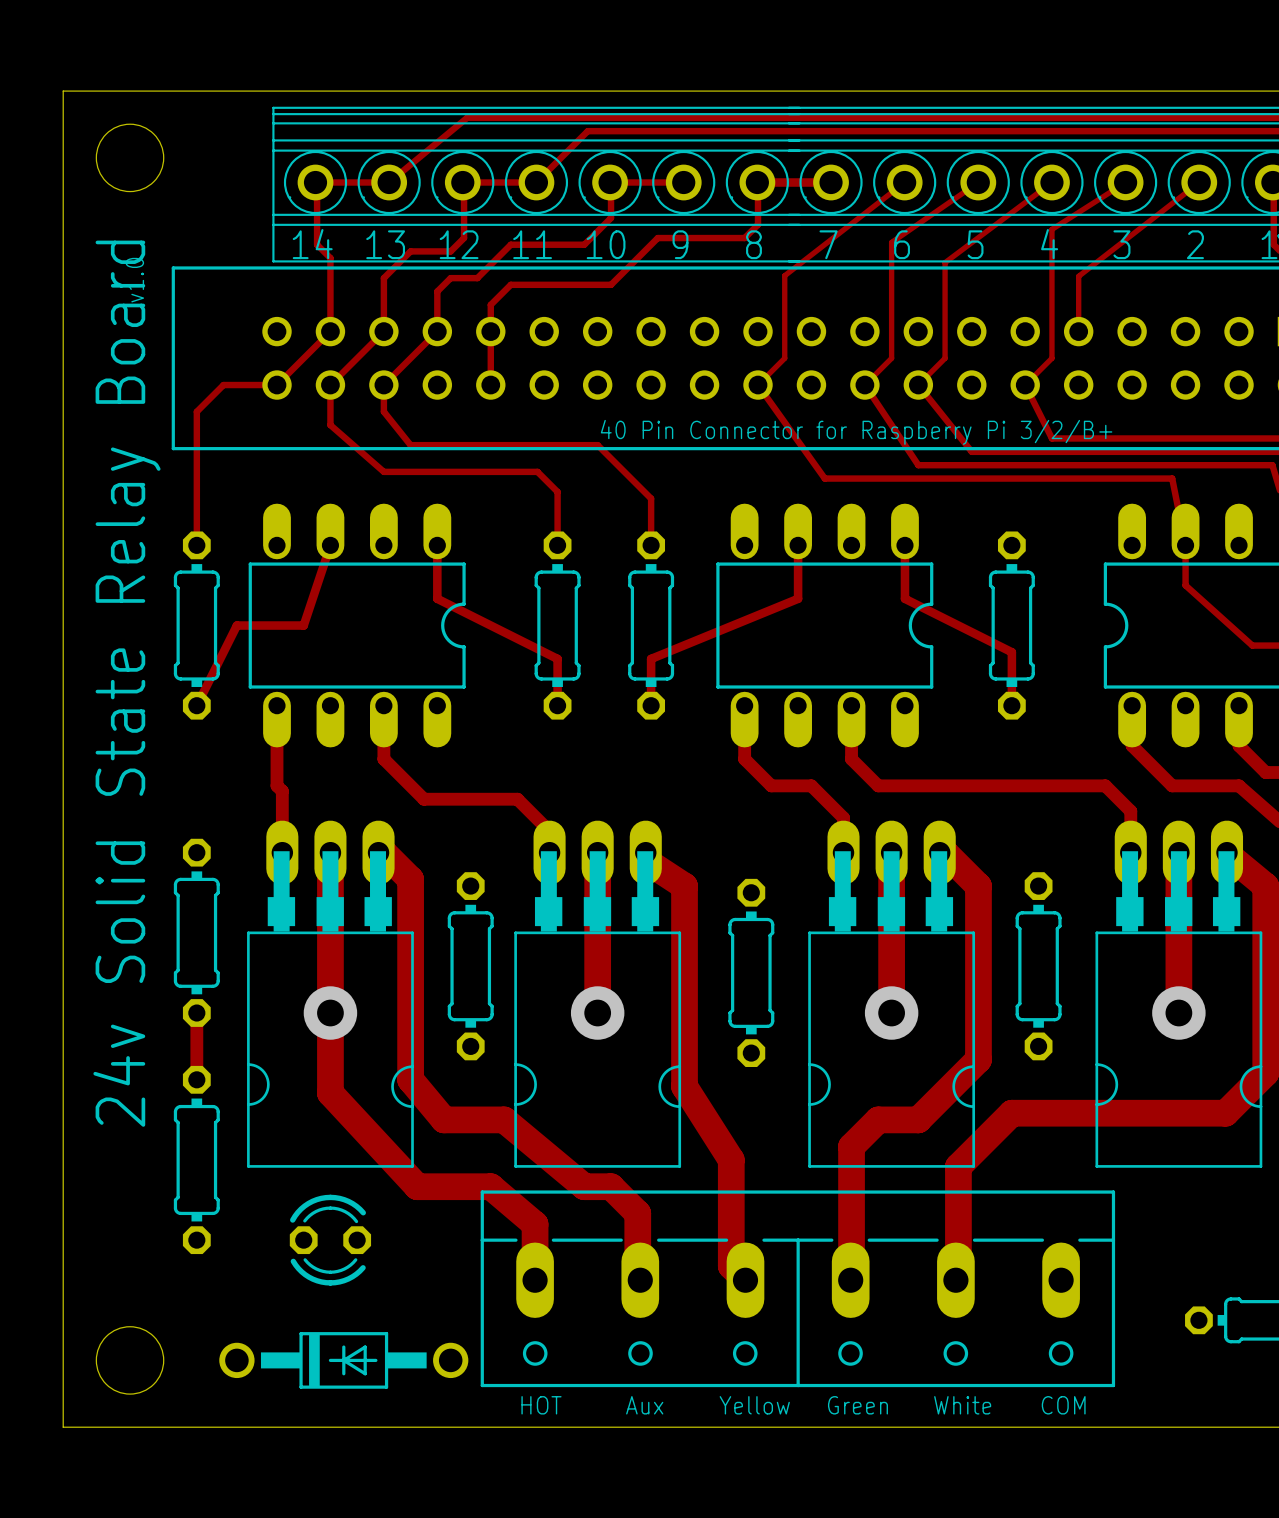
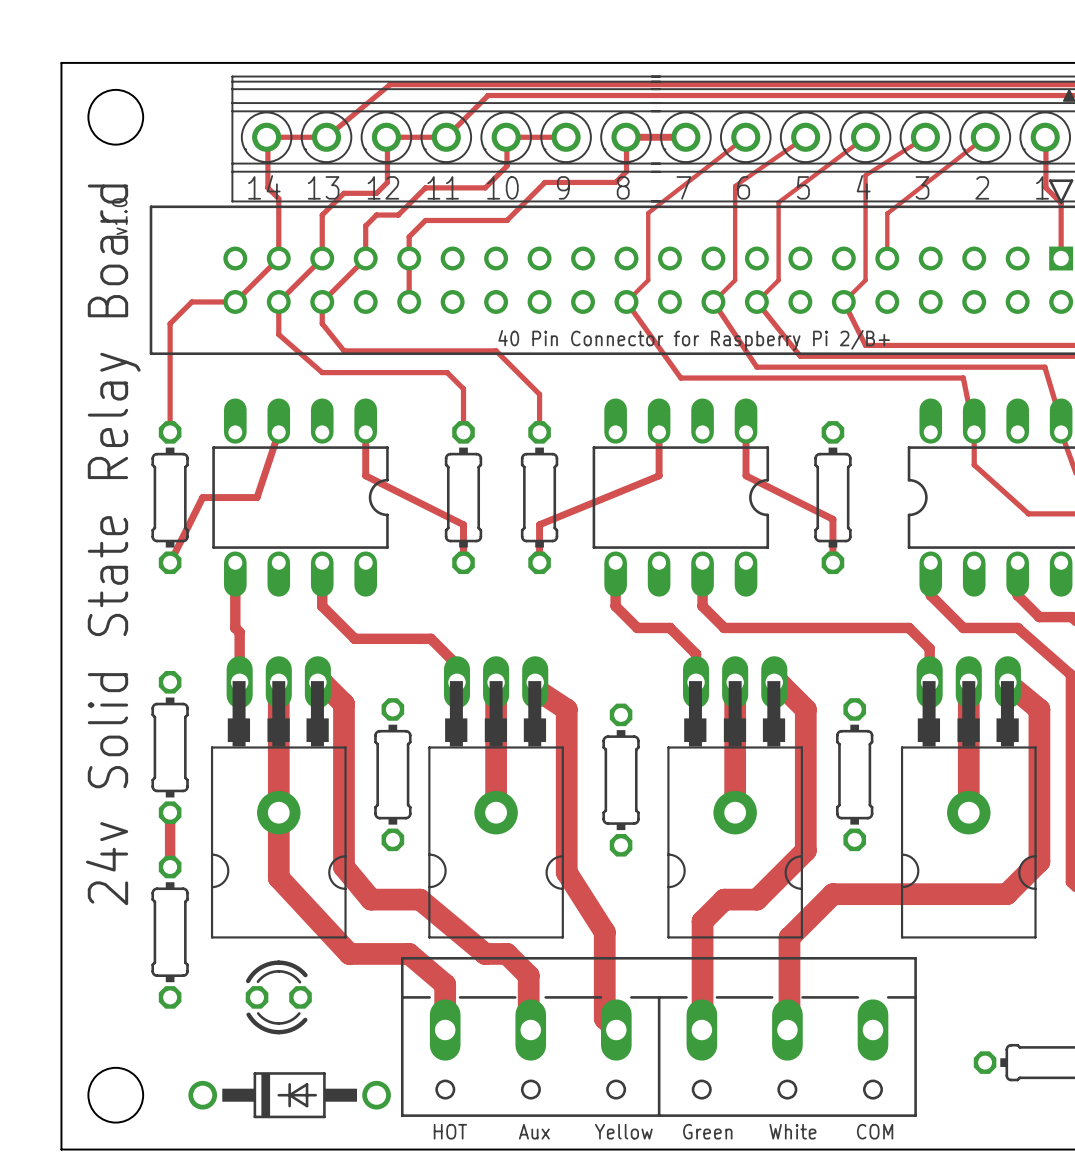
text: 40 Pin Connector for Raspberry Pi 3/2/B+ (856, 432) -> 40 Pin Connector for Raspberry Pi 2/B+ (694, 340)

